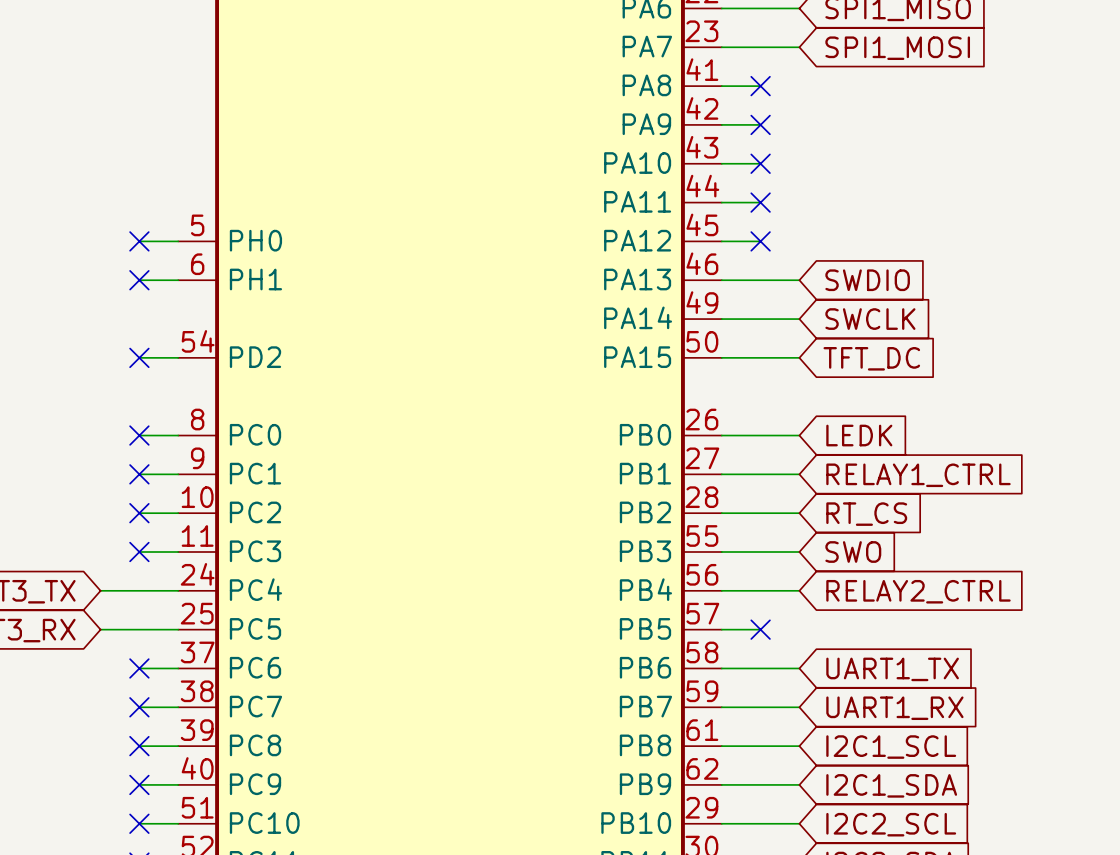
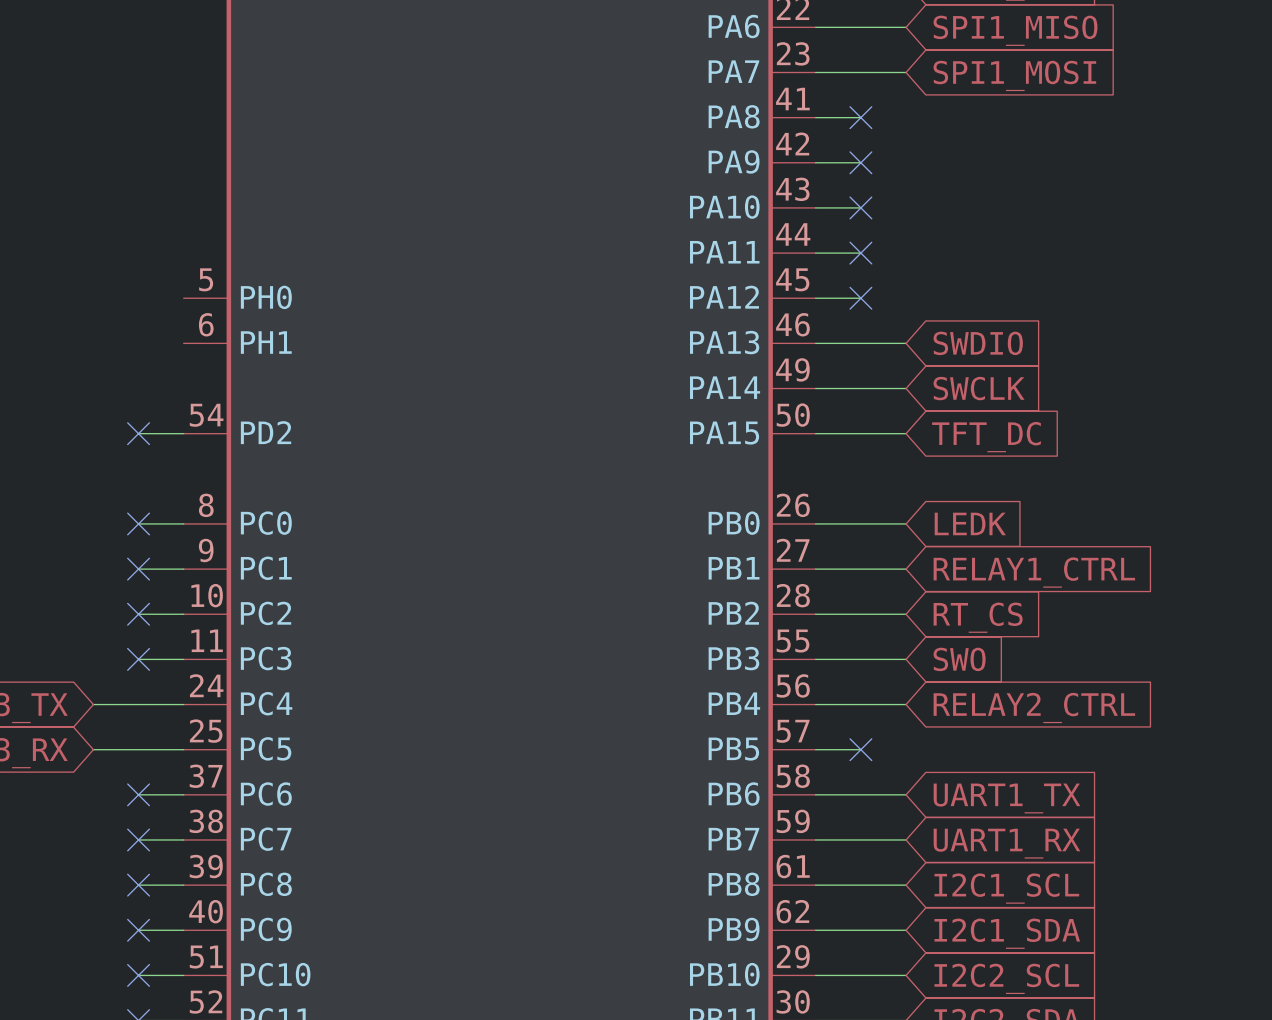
wire: (139, 241) (178, 241) -> none
no-connect mark: (139, 241) -> none
wire: (139, 280) (178, 280) -> none
no-connect mark: (139, 280) -> none

